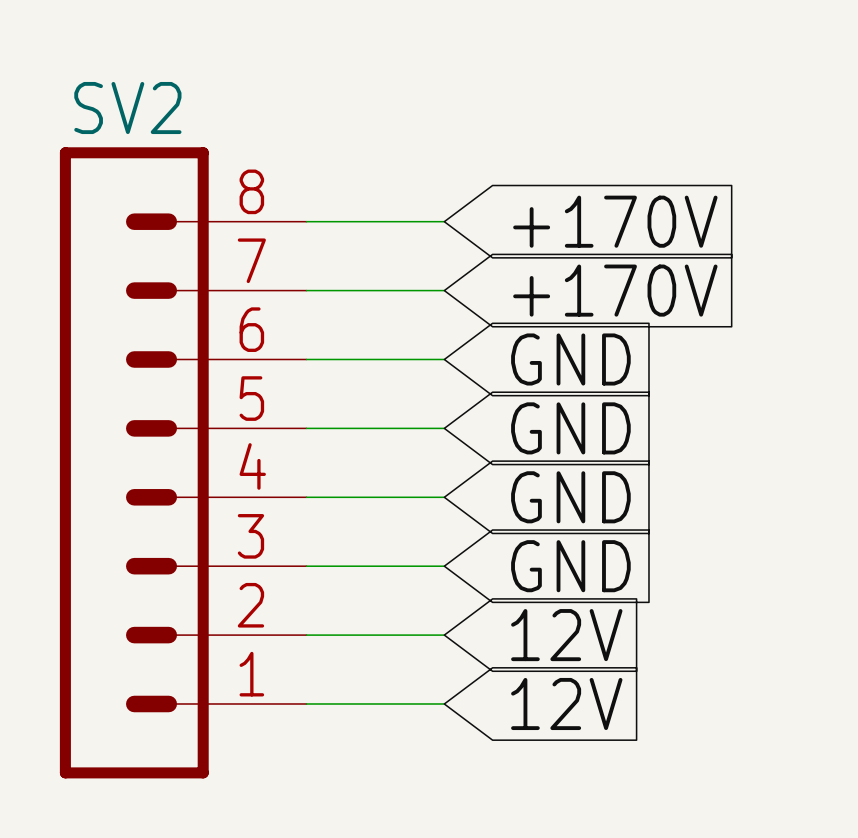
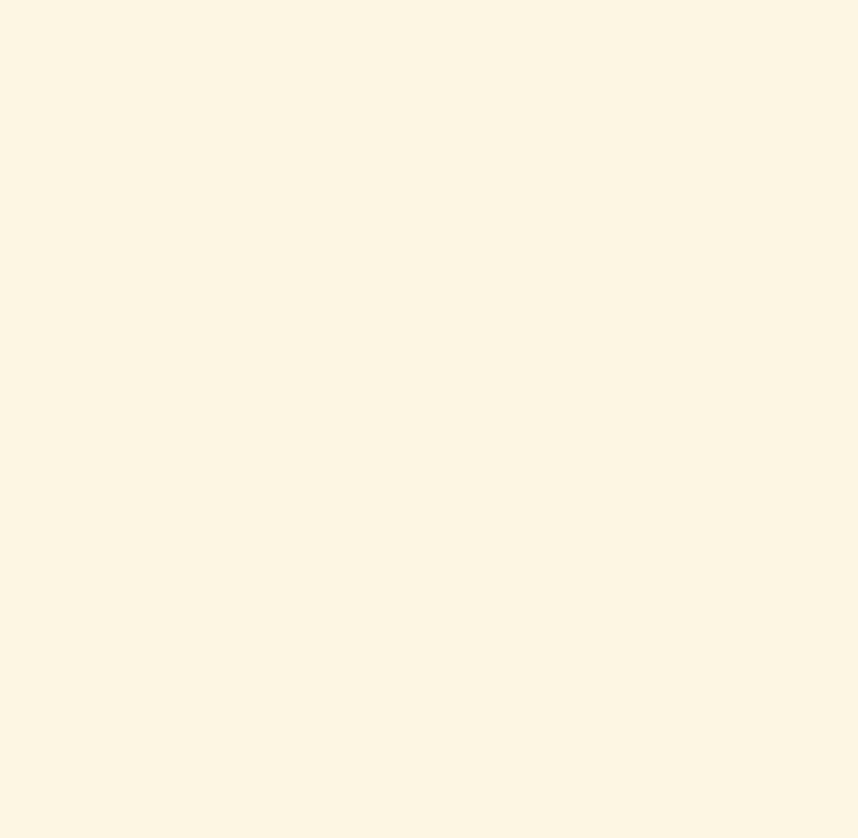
wire: (306, 221) (444, 221) -> none
global label: +170V (615, 221) -> none
wire: (306, 290) (444, 290) -> none
global label: +170V (615, 290) -> none
wire: (306, 359) (444, 359) -> none
global label: GND (570, 359) -> none
wire: (306, 428) (444, 428) -> none
global label: GND (570, 428) -> none
SV2: (183, 462) -> none
wire: (306, 497) (444, 497) -> none
global label: GND (570, 497) -> none
wire: (306, 566) (444, 566) -> none
global label: GND (570, 566) -> none
wire: (306, 635) (444, 635) -> none
global label: 12V (566, 635) -> none
wire: (306, 703) (444, 703) -> none
global label: 12V (566, 703) -> none

